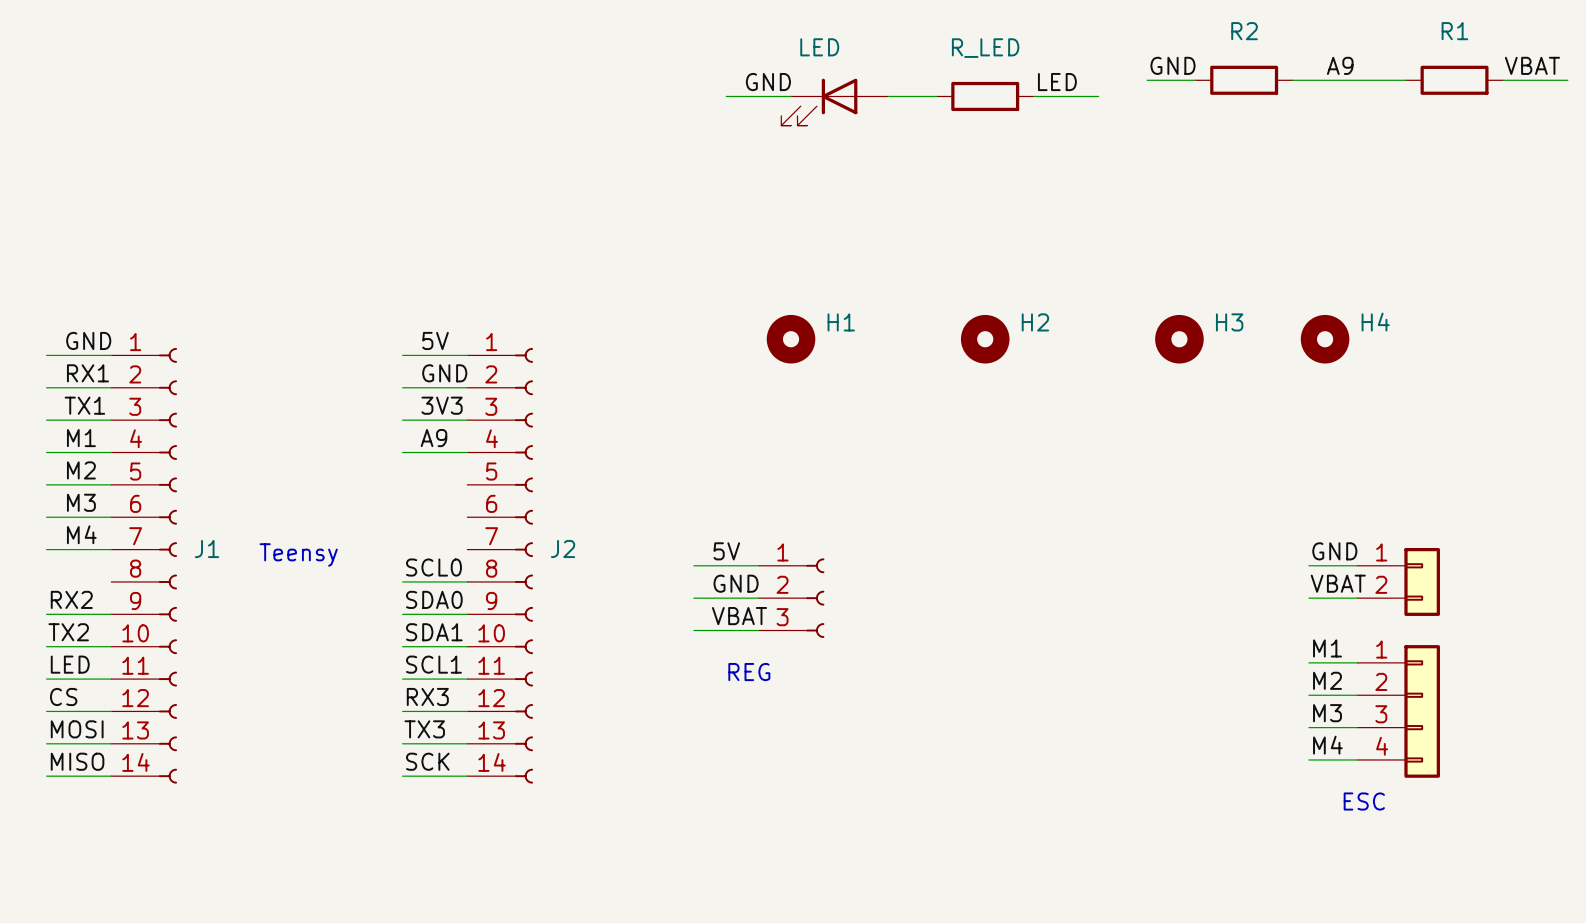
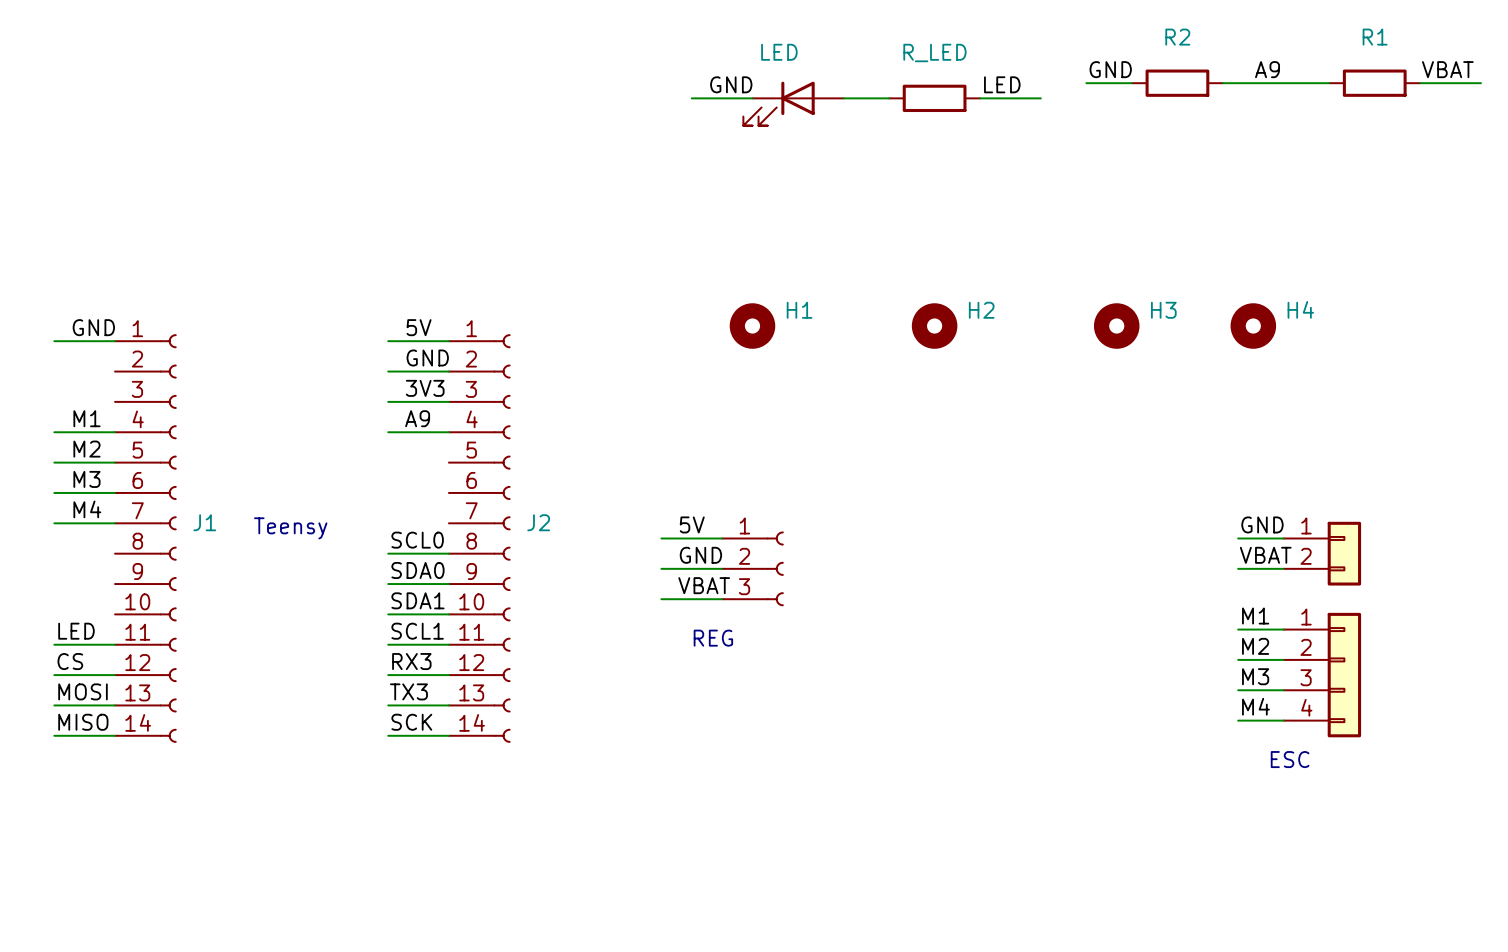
label: RX1 (87, 373) -> none
wire: (46, 387) (111, 387) -> none
label: TX1 (84, 405) -> none
wire: (46, 420) (111, 420) -> none
label: RX2 (71, 599) -> none
wire: (46, 614) (111, 614) -> none
label: TX2 (68, 632) -> none
wire: (46, 646) (111, 646) -> none

